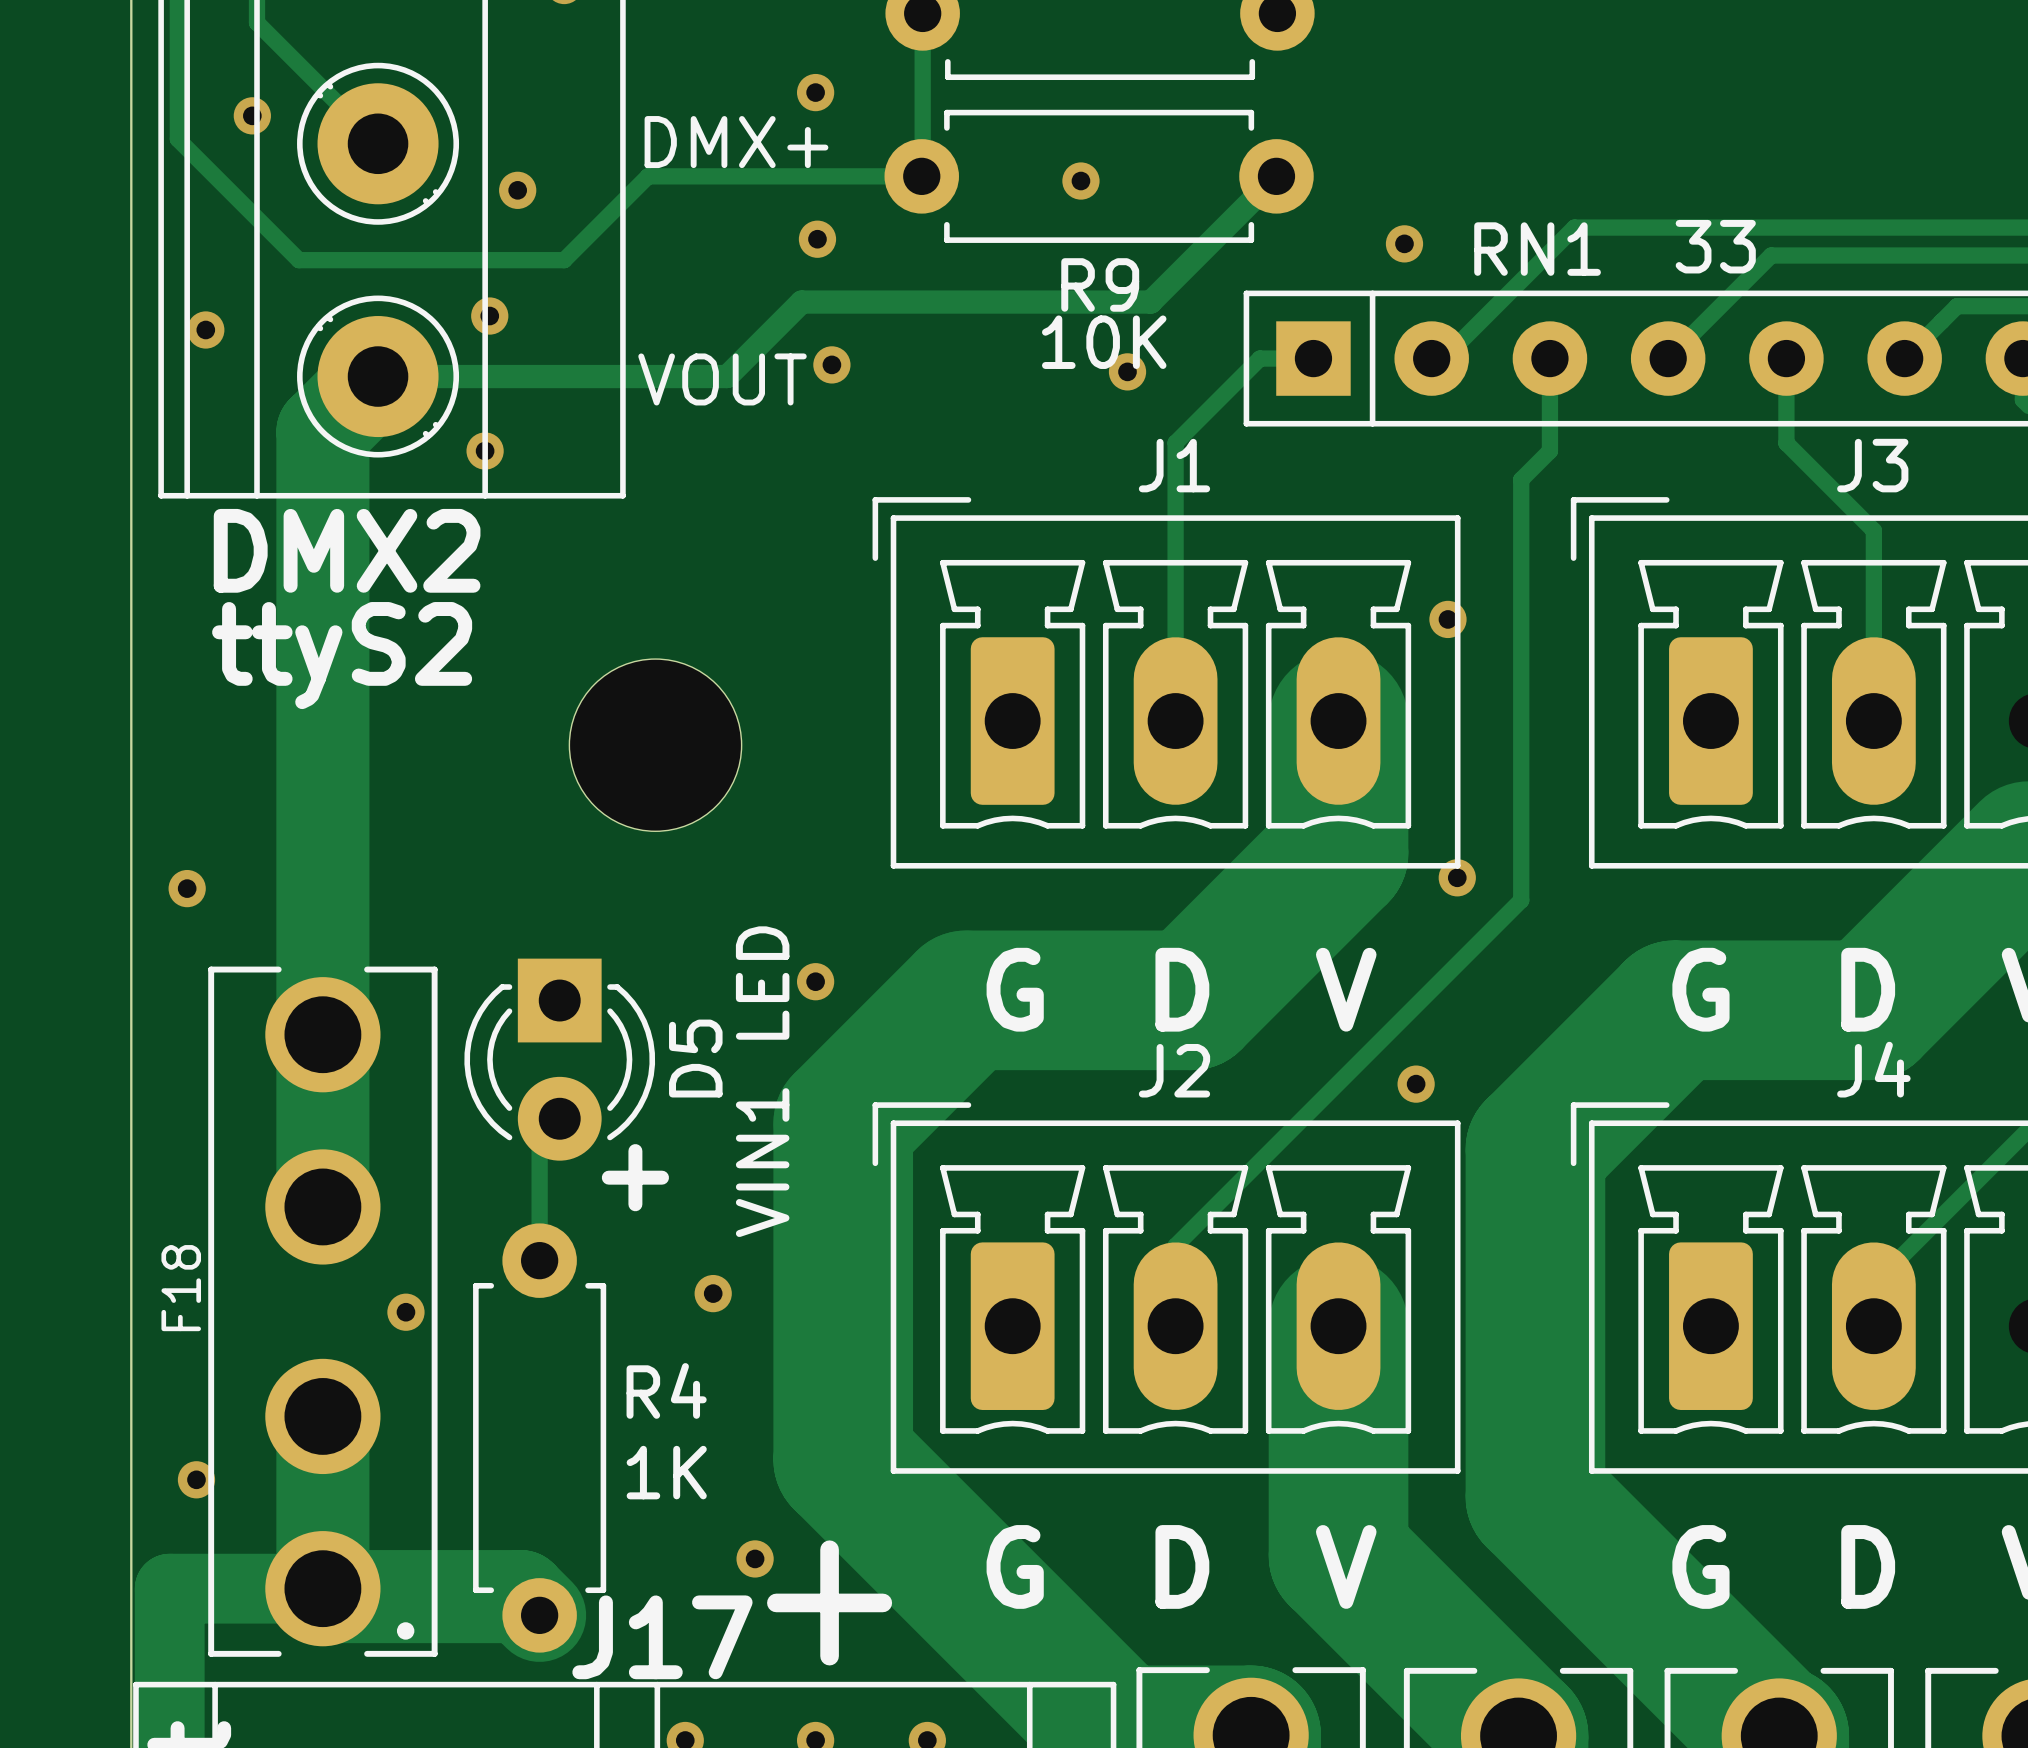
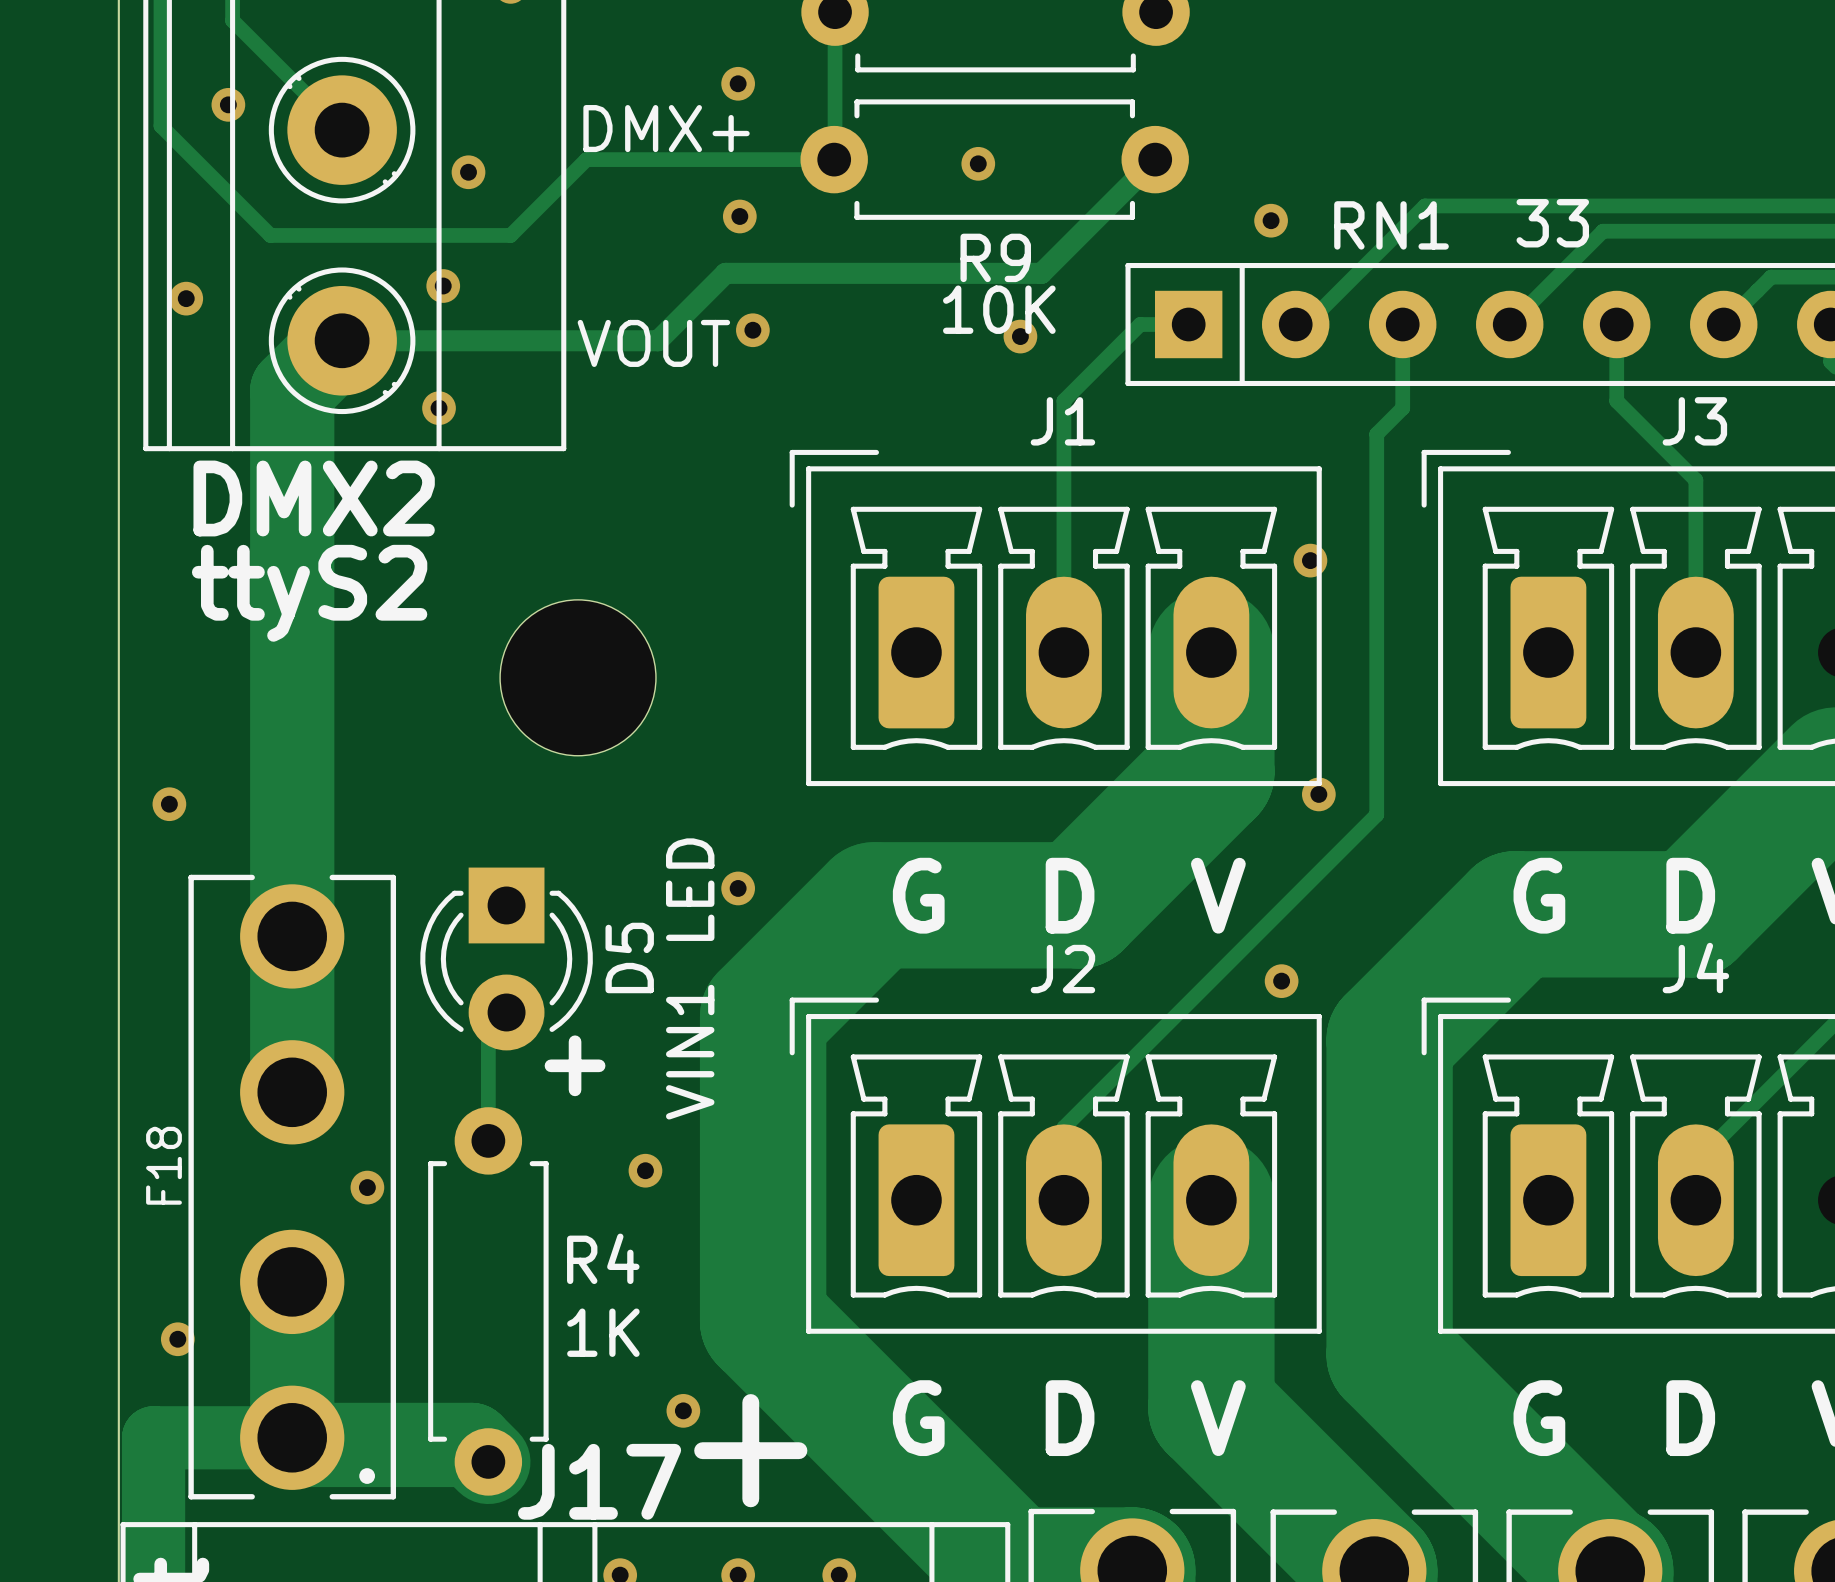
part position: (655, 745) -> (578, 677)

